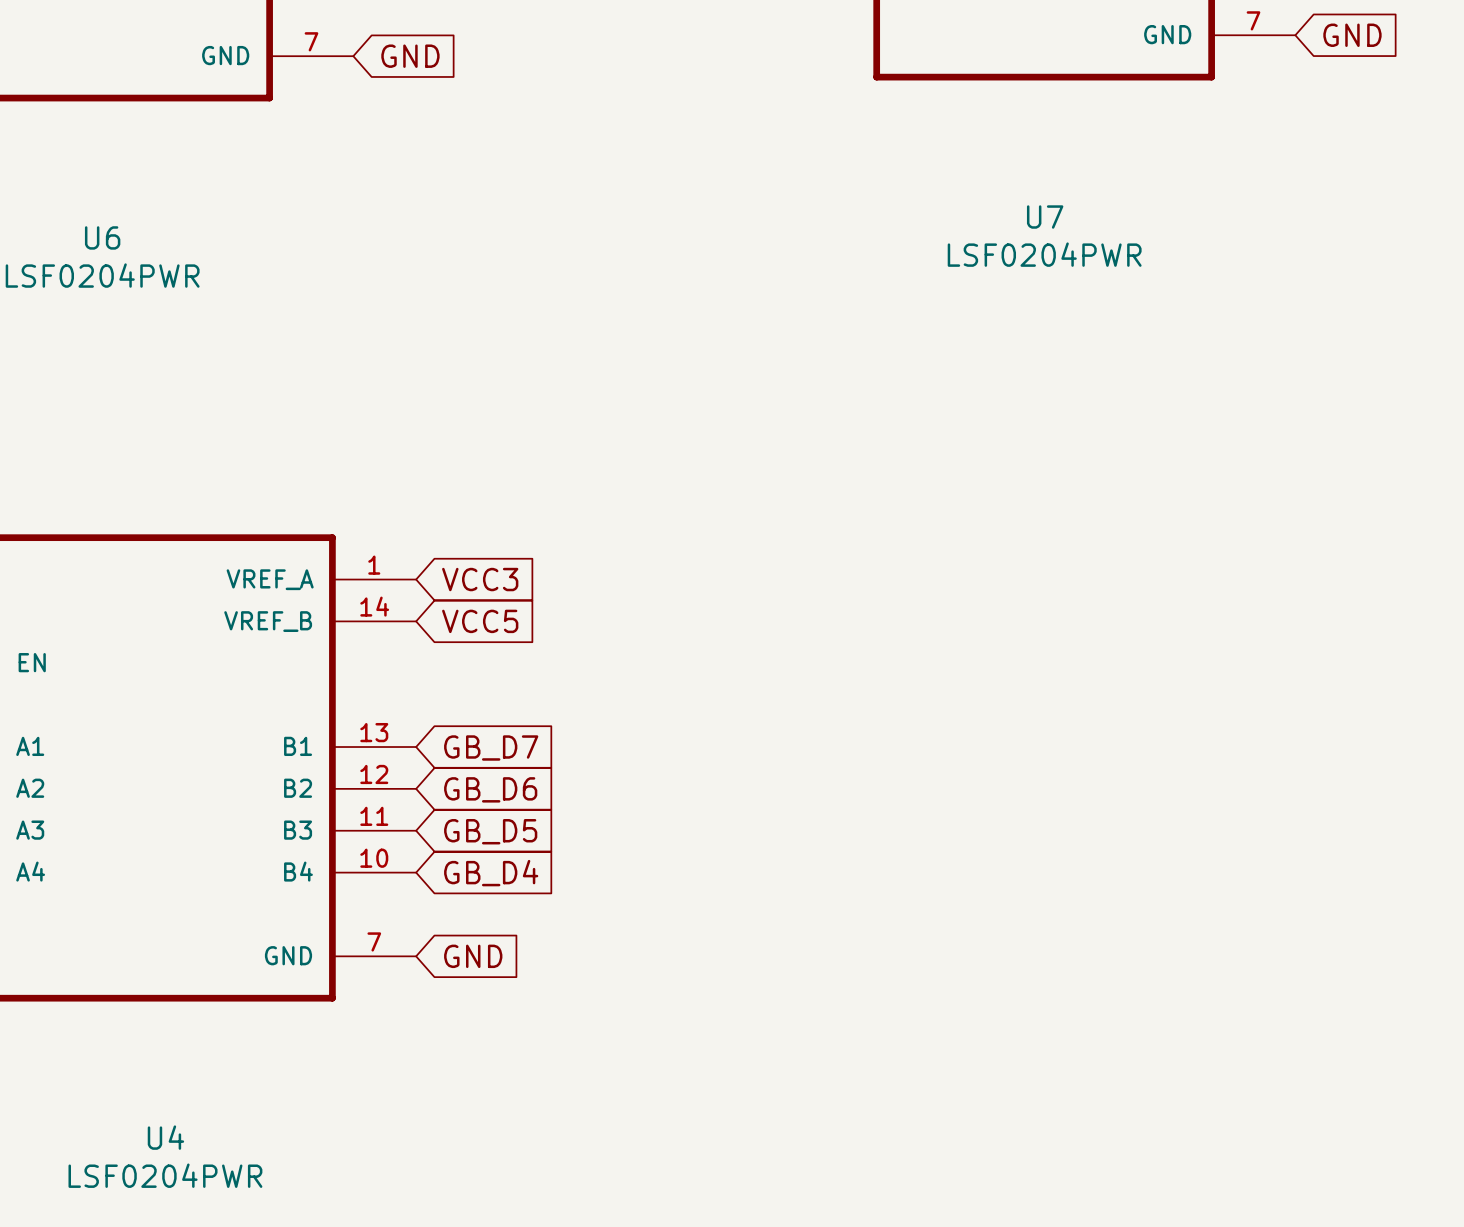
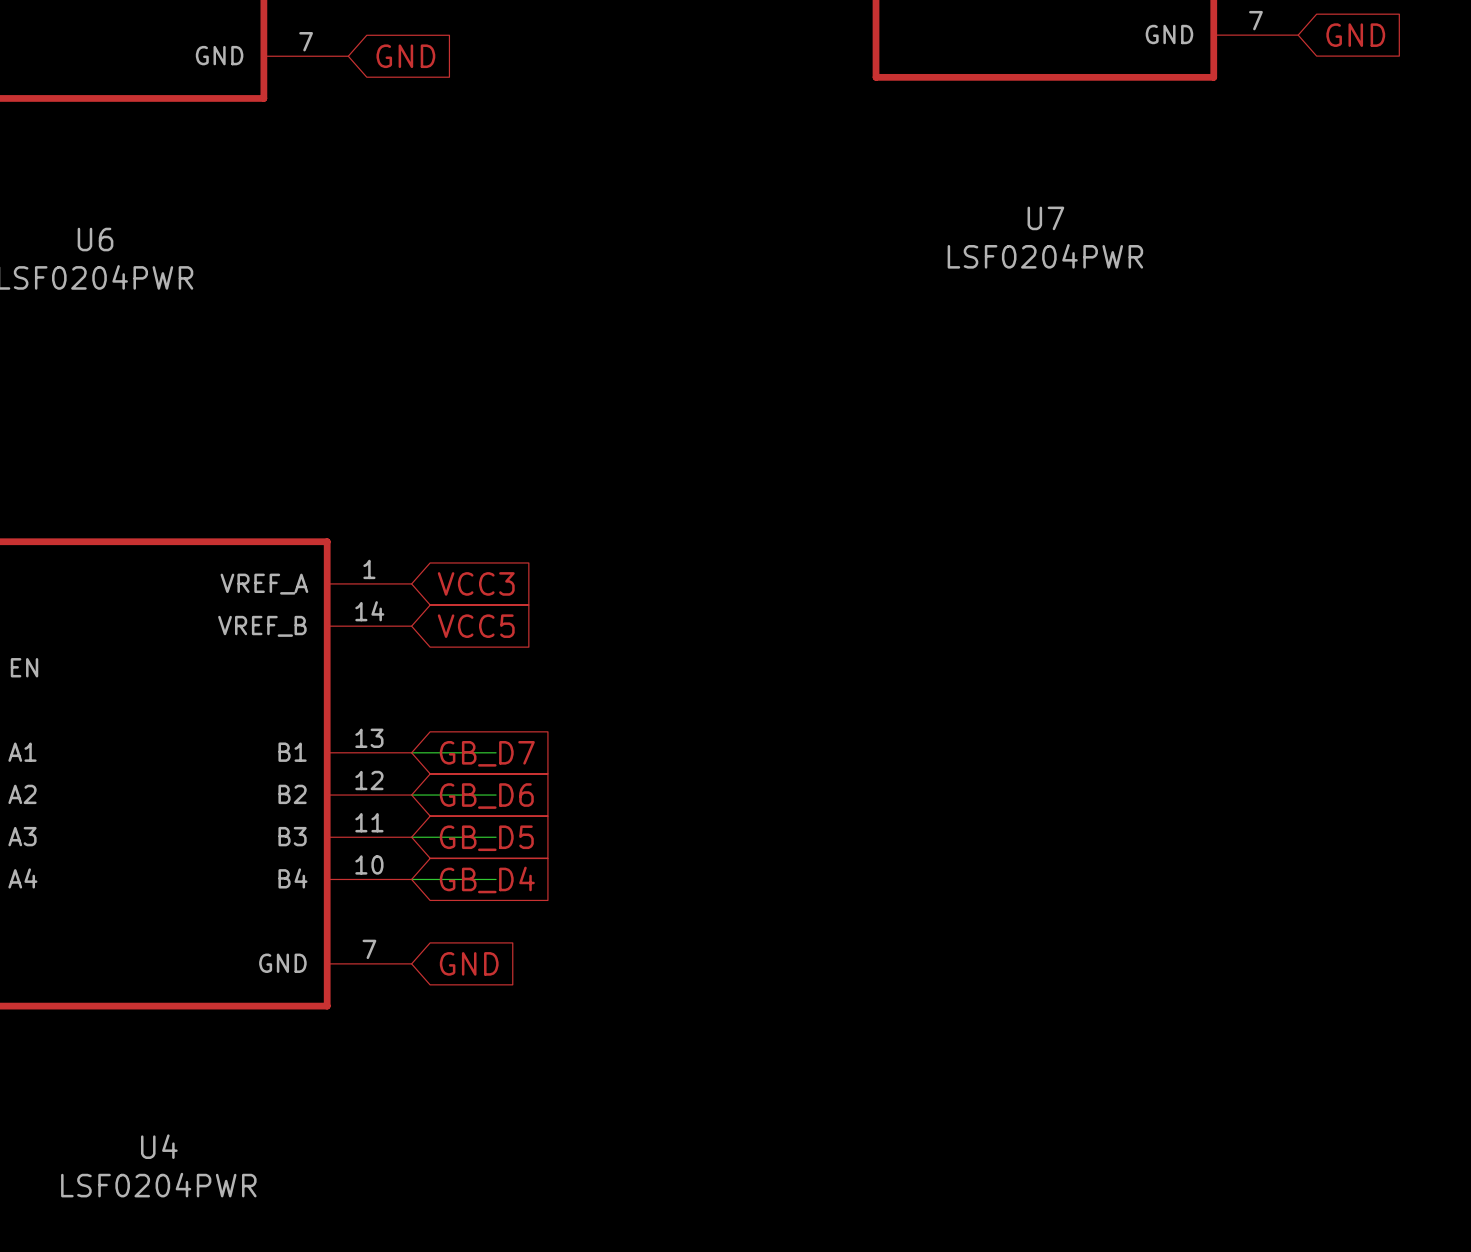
wire: none -> (411, 752) (496, 752)
wire: none -> (411, 795) (496, 795)
wire: none -> (411, 837) (496, 837)
wire: none -> (411, 879) (496, 879)

